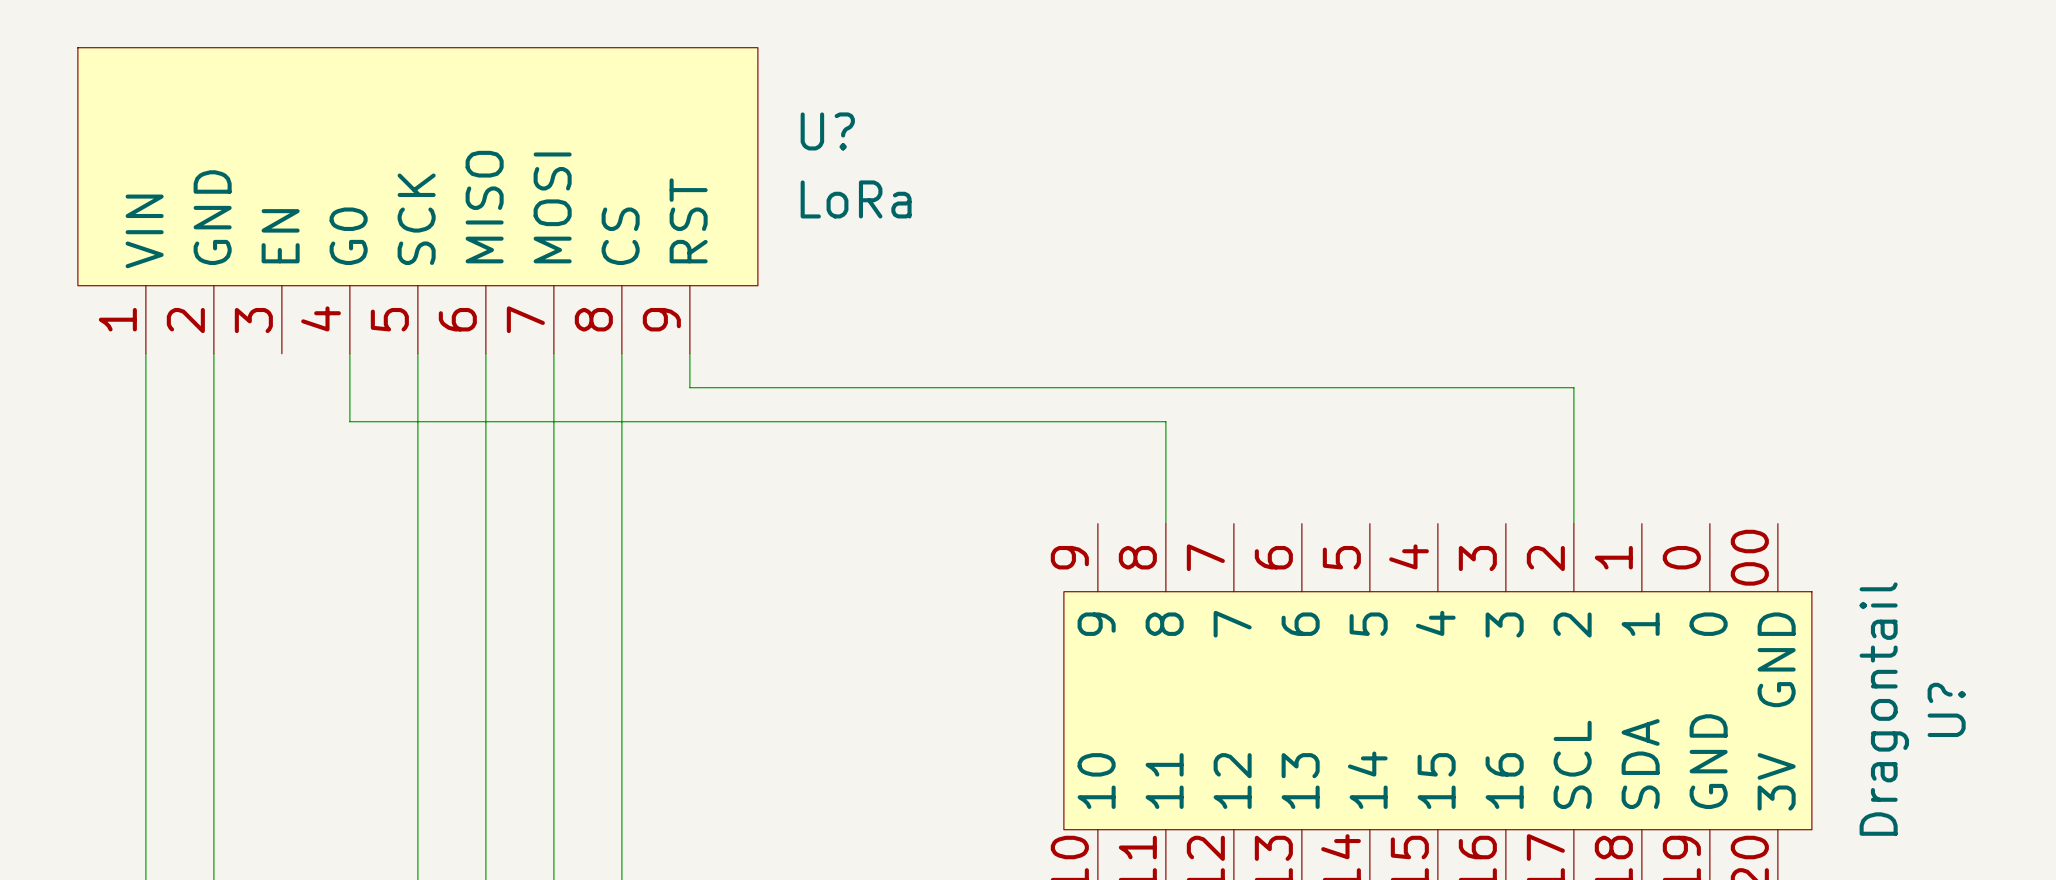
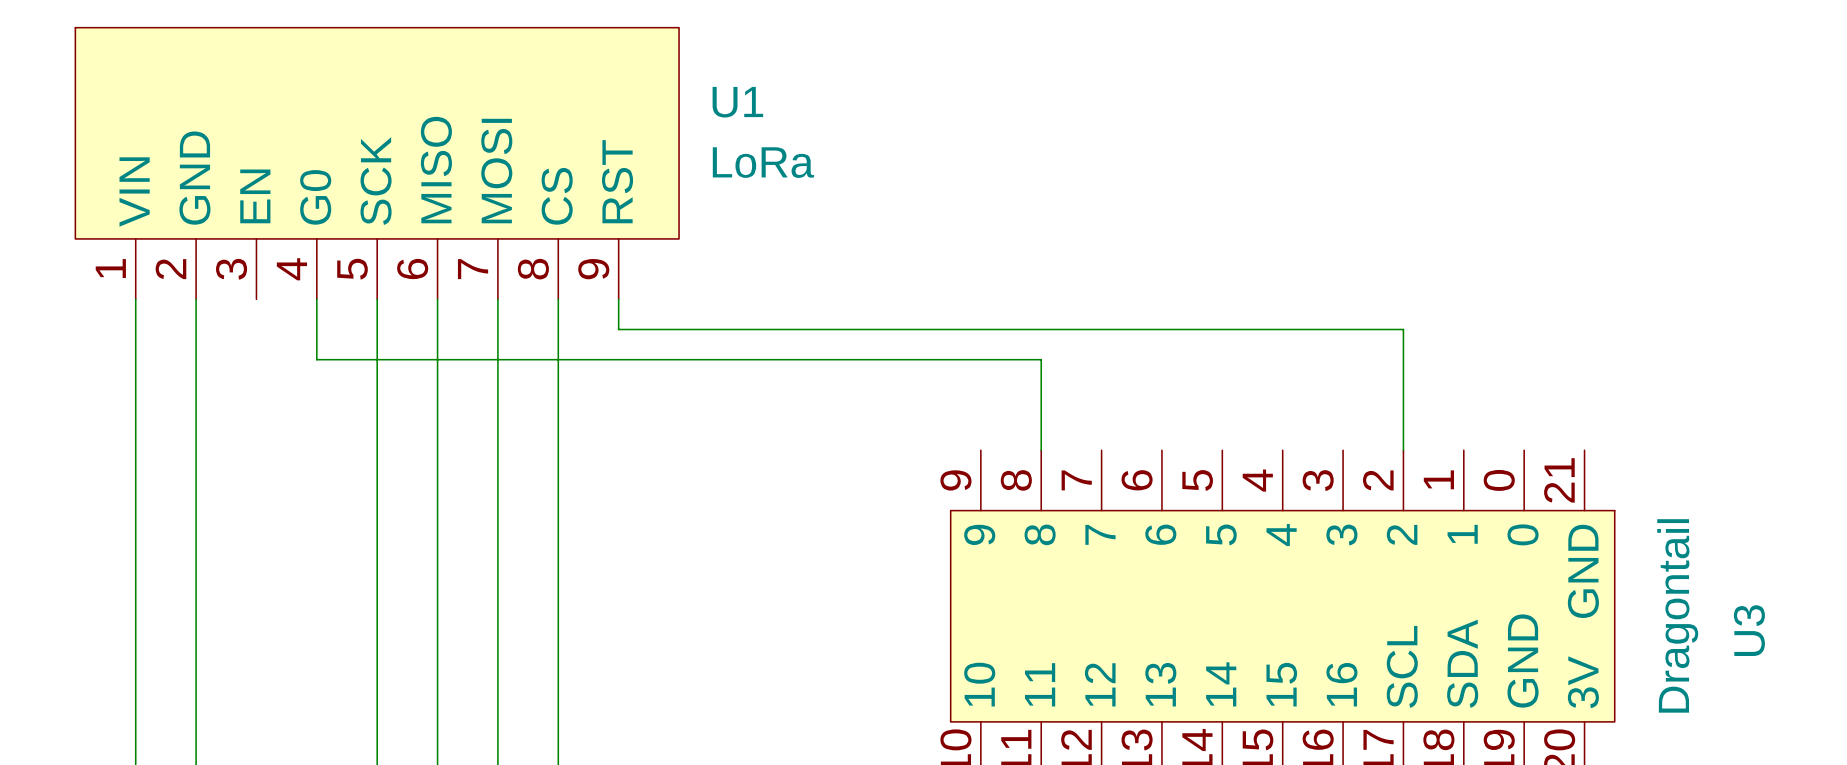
U? name: U? (827, 131) -> U1 (737, 102)
U? pin number: 00 (1749, 557) -> 21 (1559, 480)
U? name: U? (1946, 709) -> U3 (1749, 630)

